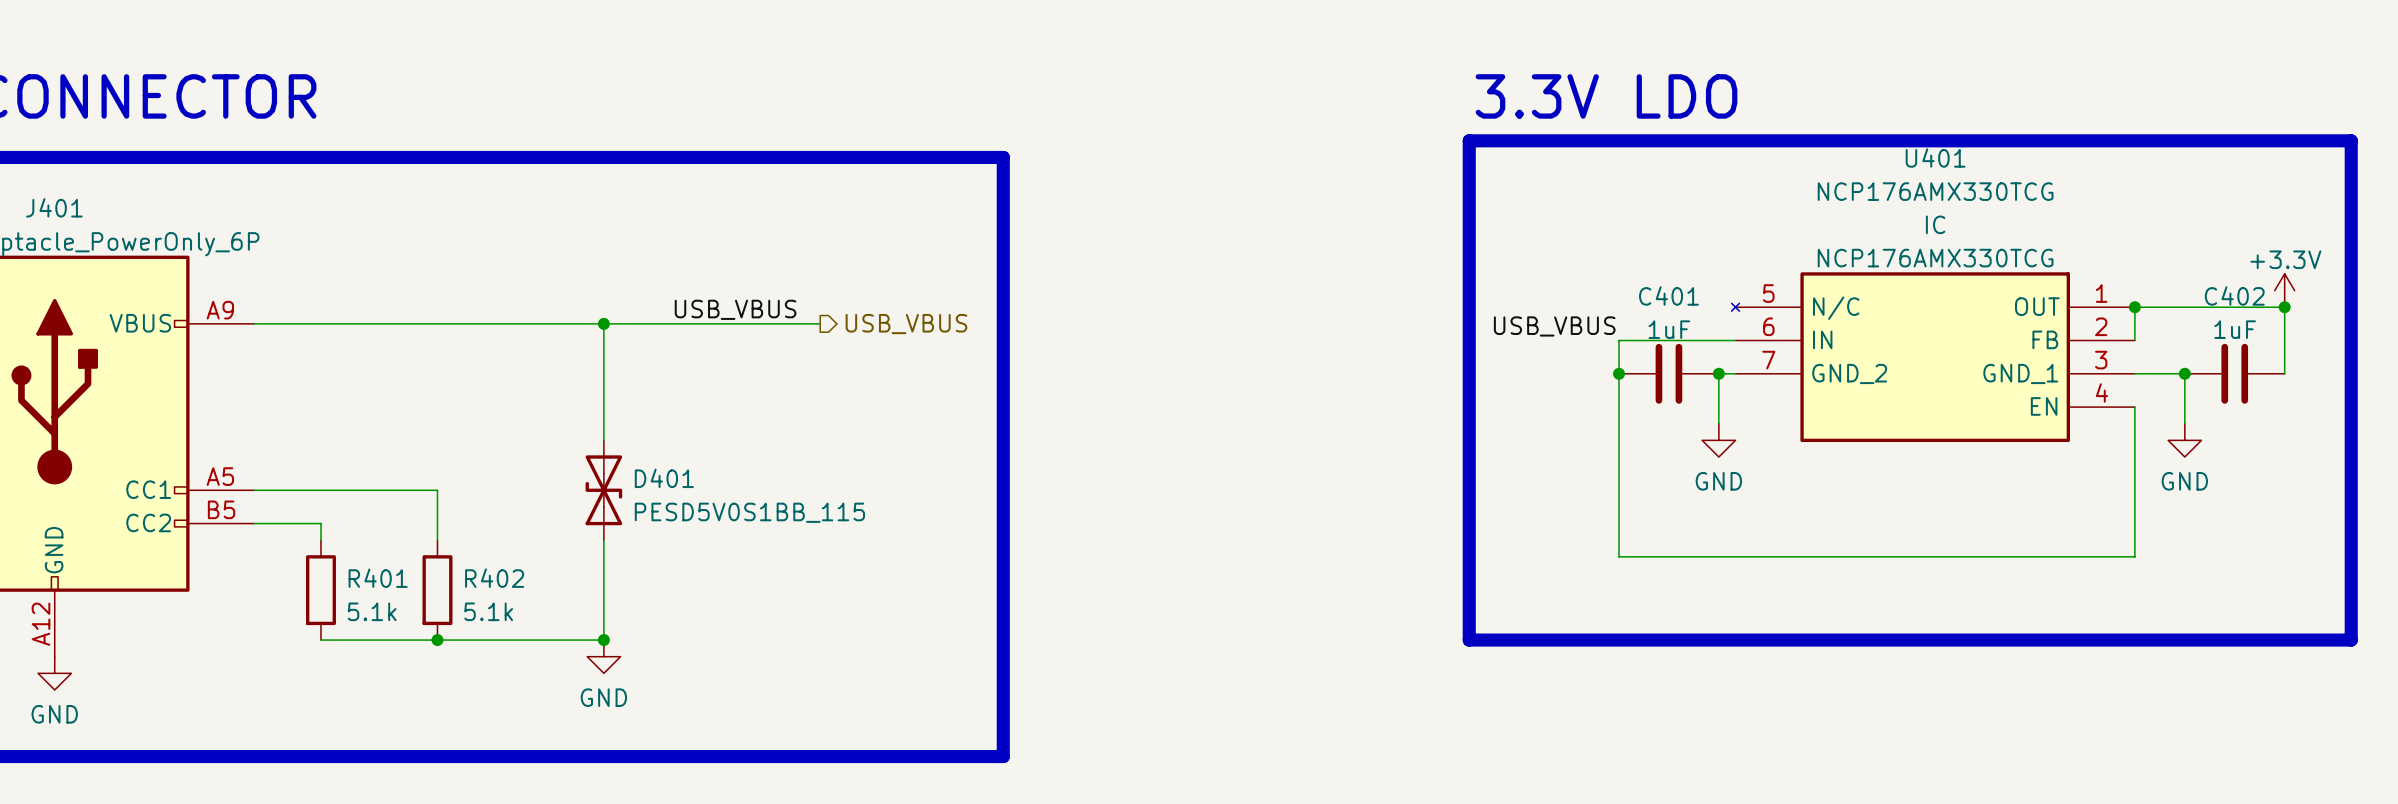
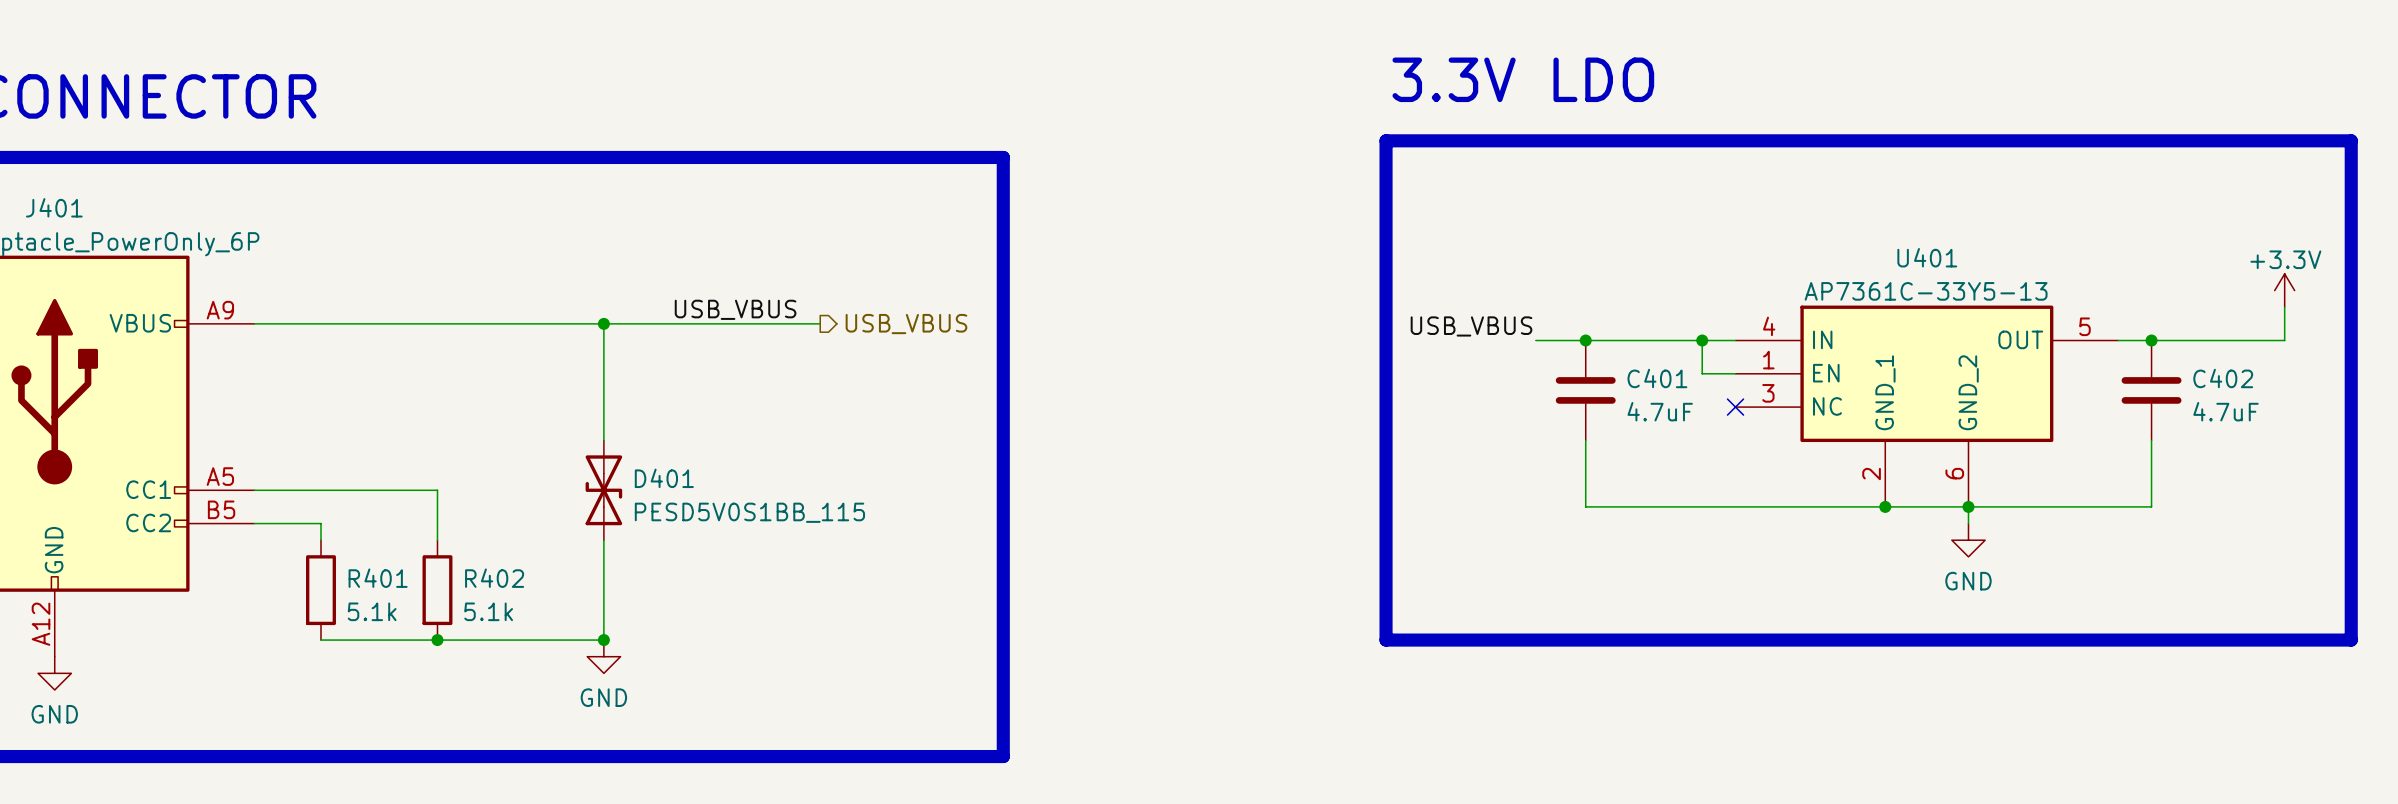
text position: 3.3V LDO (1606, 96) -> 3.3V LDO (1523, 79)
line: (1469, 140) (1469, 640) -> (1469, 140) (1386, 140) (1386, 640) (1469, 640)
U401 name position: U401 (1935, 157) -> U401 (1927, 257)
U401 value: NCP176AMX330TCG (1935, 191) -> AP7361C-33Y5-13 (1926, 291)
U401 text: IC (1935, 224) -> none
U401 text: NCP176AMX330TCG (1935, 258) -> none
U401 symbol: [1731, 272, 2135, 443] -> [1735, 305, 2119, 507]
junction: (2134, 307) -> none
wire: (2284, 307) (2134, 307) (2134, 340) -> none
junction: (2284, 307) -> none
label position: USB_VBUS (1554, 326) -> USB_VBUS (1471, 326)
C401 value: 1uF (1669, 329) -> 4.7uF (1660, 411)
C402 value: 1uF (2235, 329) -> 4.7uF (2226, 411)
junction: none -> (1585, 340)
wire: (1619, 340) (1619, 556) (2134, 556) (2134, 407) -> (1619, 340) (1535, 340)
junction: none -> (2151, 340)
wire: (2284, 340) (2284, 373) -> (2284, 340) (2118, 340)
junction: (1619, 373) -> none
C401 rotation: 0° (1668, 373) -> 90° clockwise (1585, 390)
C401 position: (1668, 373) -> (1585, 390)
wire: (1718, 373) (1718, 423) -> (1718, 373) (1702, 373) (1702, 340)
junction position: (1718, 373) -> (1702, 340)
wire: (2134, 373) (2184, 373) (2184, 423) -> none
junction: (2184, 373) -> none
C402 rotation: 0° (2234, 373) -> 90° clockwise (2151, 390)
C402 position: (2234, 373) -> (2151, 390)
no-connect mark: none -> (1735, 407)
wire: none -> (1585, 440) (1585, 506) (2151, 506) (2151, 440)
power symbol: GND (1718, 440) -> none
power symbol: GND (2184, 440) -> none
junction: none -> (1885, 506)
wire: none -> (1968, 506) (1968, 523)
junction: none -> (1968, 506)
power symbol: none -> GND (1968, 540)

